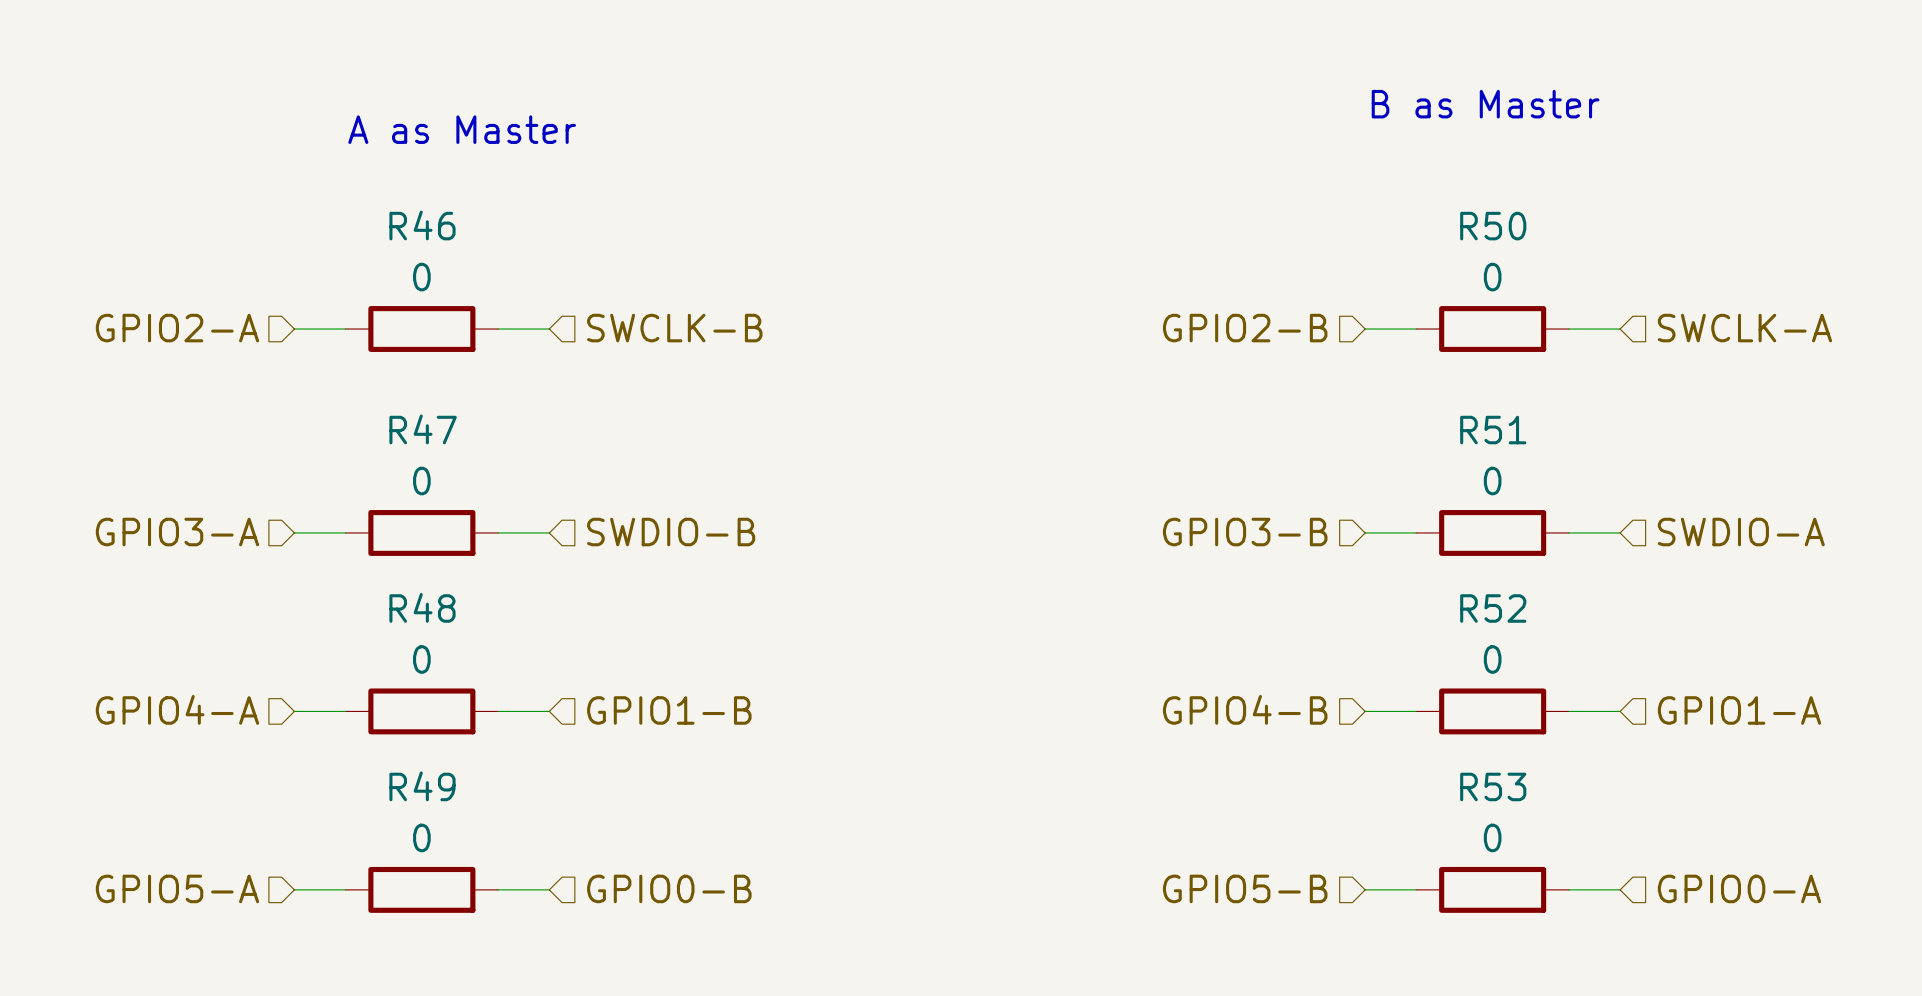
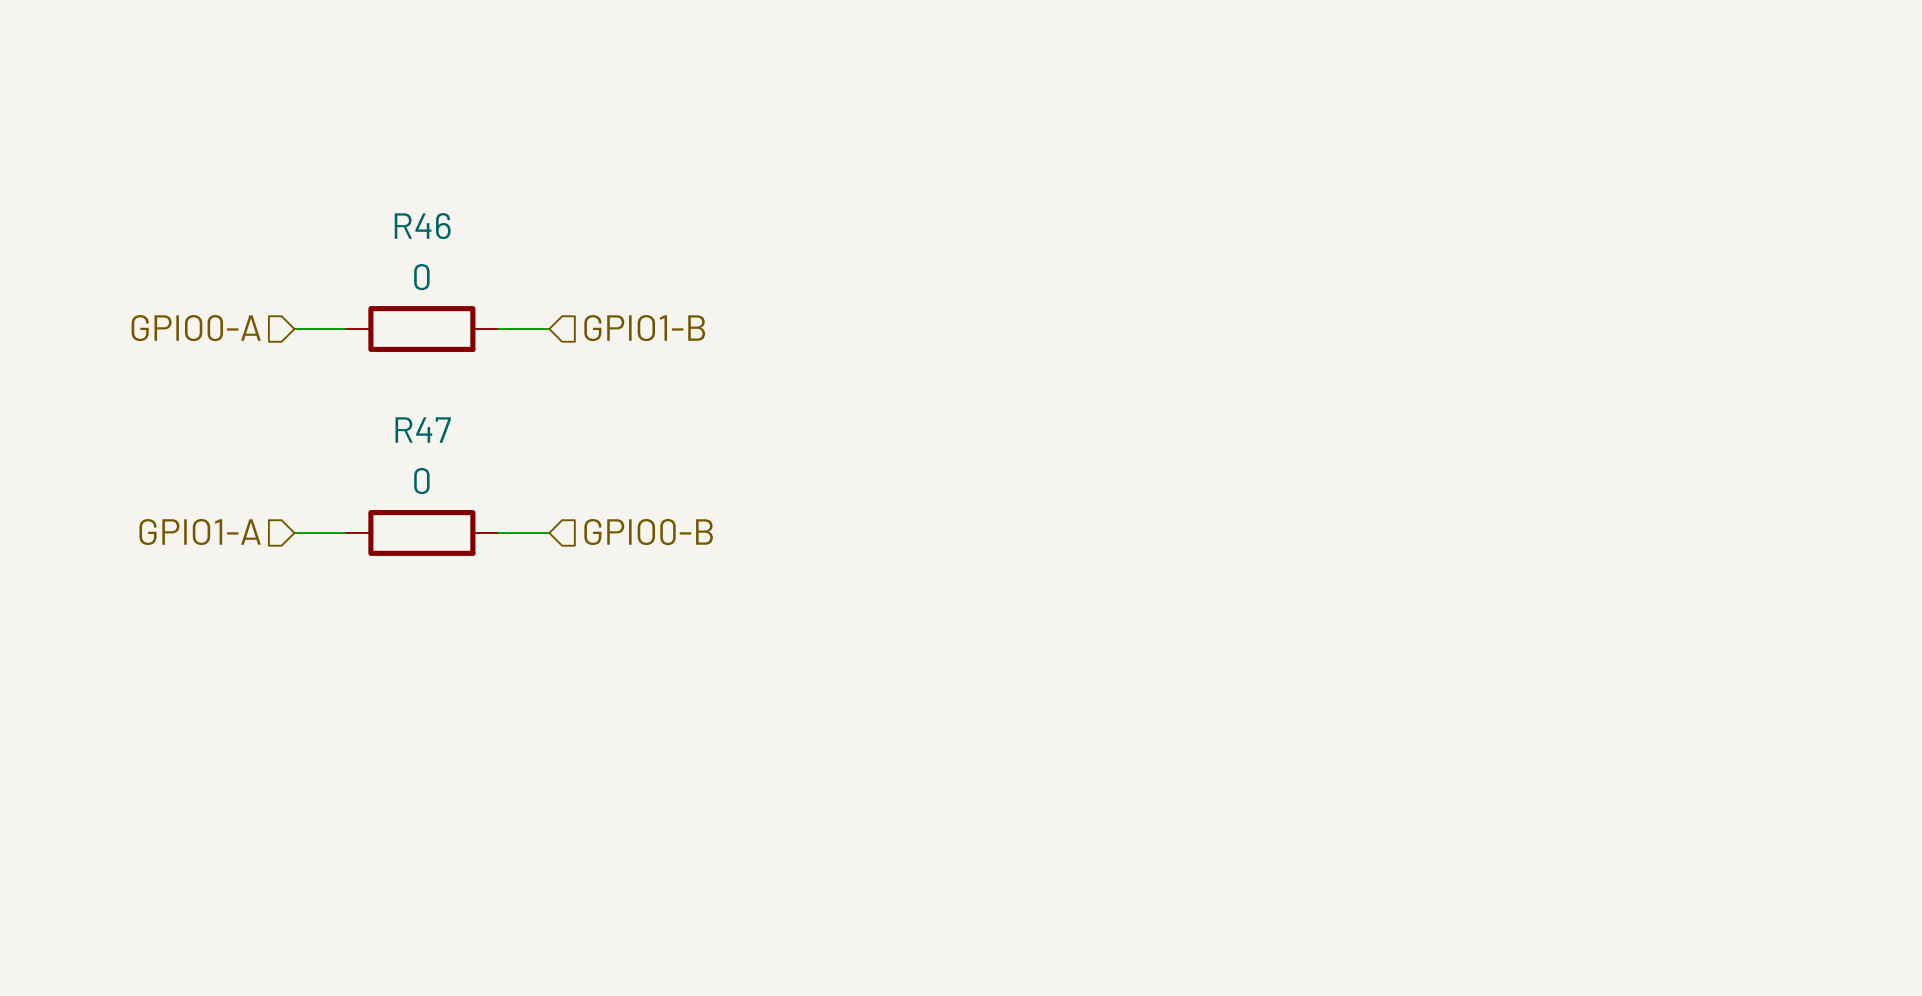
text: B as Master (1485, 104) -> none
text: A as Master (462, 129) -> none
hierarchical label: GPIO2-A (177, 328) -> GPIO0-A (196, 328)
hierarchical label: SWCLK-B (674, 328) -> GPIO1-B (644, 328)
hierarchical label: GPIO2-B (1245, 328) -> none
hierarchical label: SWCLK-A (1744, 328) -> none
wire: (1365, 329) (1416, 329) -> none
R50: 0 (1492, 329) -> none
wire: (1569, 329) (1620, 329) -> none
hierarchical label: GPIO3-A (177, 532) -> GPIO1-A (200, 532)
hierarchical label: SWDIO-B (671, 532) -> GPIO0-B (648, 532)
hierarchical label: GPIO3-B (1245, 532) -> none
wire: (1365, 532) (1416, 532) -> none
R51: 0 (1492, 532) -> none
wire: (1569, 532) (1620, 532) -> none
hierarchical label: SWDIO-A (1741, 532) -> none
hierarchical label: GPIO4-A (177, 709) -> none
hierarchical label: GPIO4-B (1245, 709) -> none
hierarchical label: GPIO1-B (669, 710) -> none
hierarchical label: GPIO1-A (1739, 710) -> none
wire: (294, 711) (345, 711) -> none
R48: 0 (421, 711) -> none
wire: (498, 711) (549, 711) -> none
wire: (1365, 711) (1416, 711) -> none
R52: 0 (1492, 711) -> none
wire: (1569, 711) (1620, 711) -> none
hierarchical label: GPIO5-A (177, 888) -> none
hierarchical label: GPIO0-B (669, 888) -> none
hierarchical label: GPIO5-B (1245, 888) -> none
hierarchical label: GPIO0-A (1739, 888) -> none
wire: (294, 889) (345, 889) -> none
R49: 0 (421, 889) -> none
wire: (498, 889) (549, 889) -> none
wire: (1365, 889) (1416, 889) -> none
R53: 0 (1492, 889) -> none
wire: (1569, 889) (1620, 889) -> none

